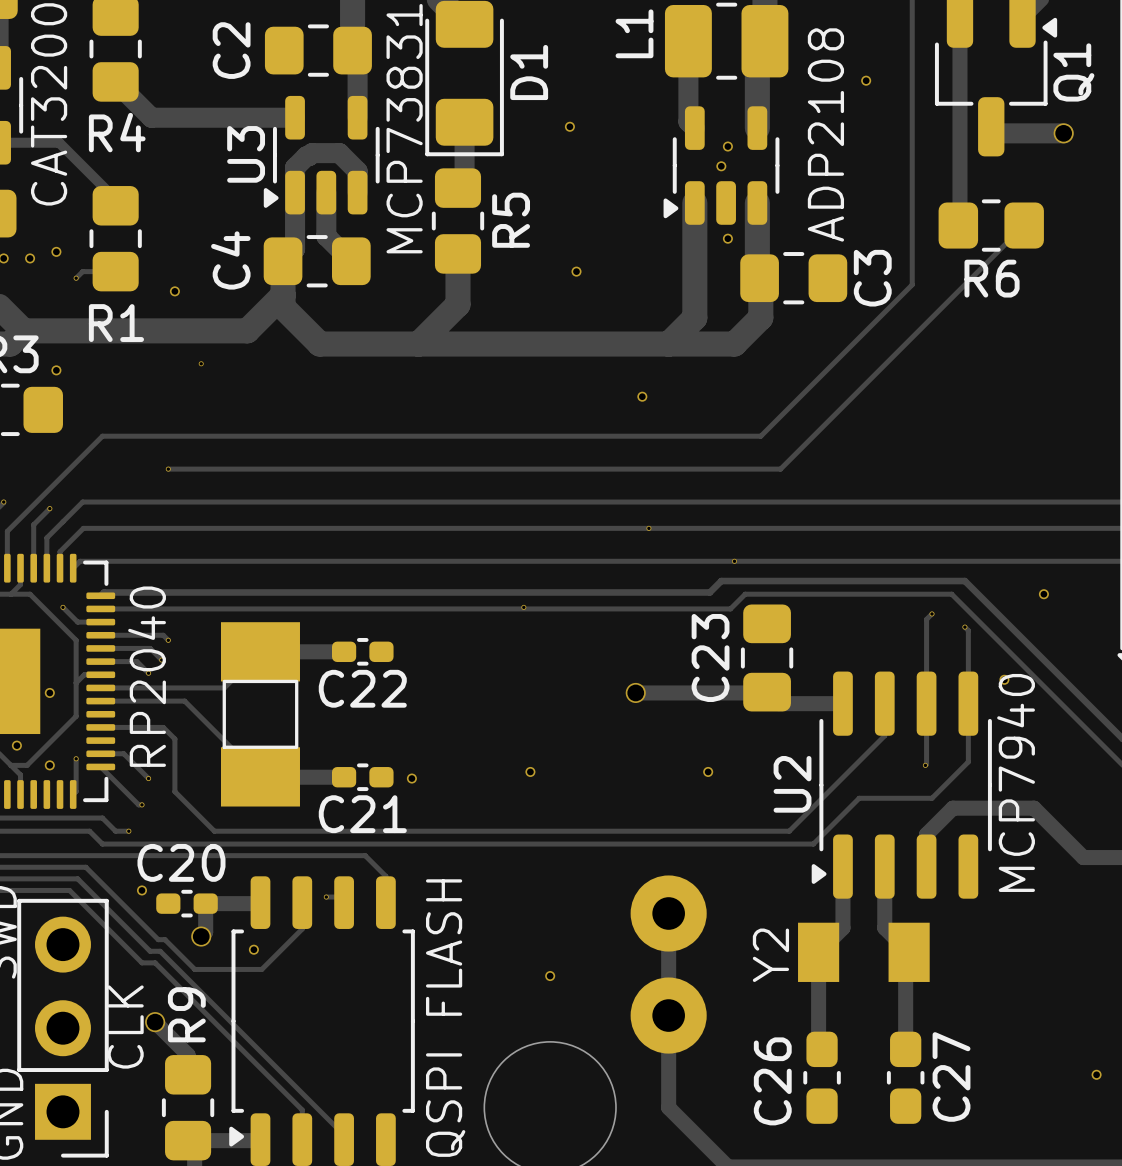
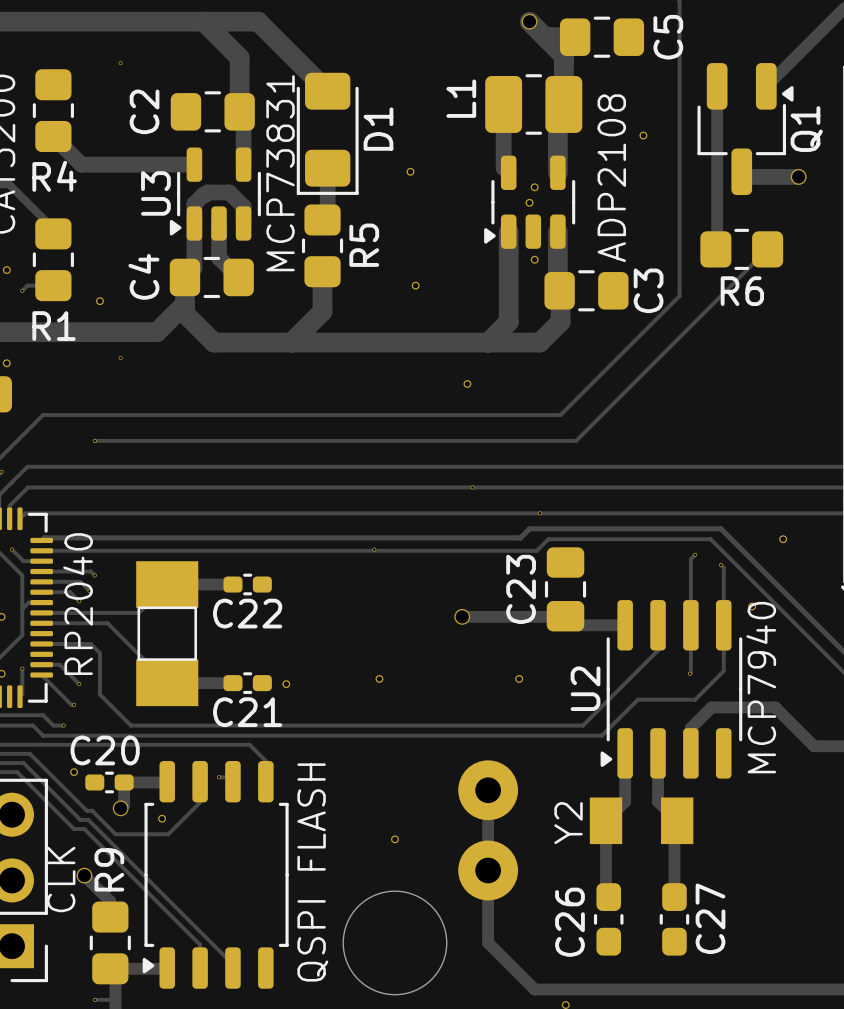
via: (1096, 1074) -> none

